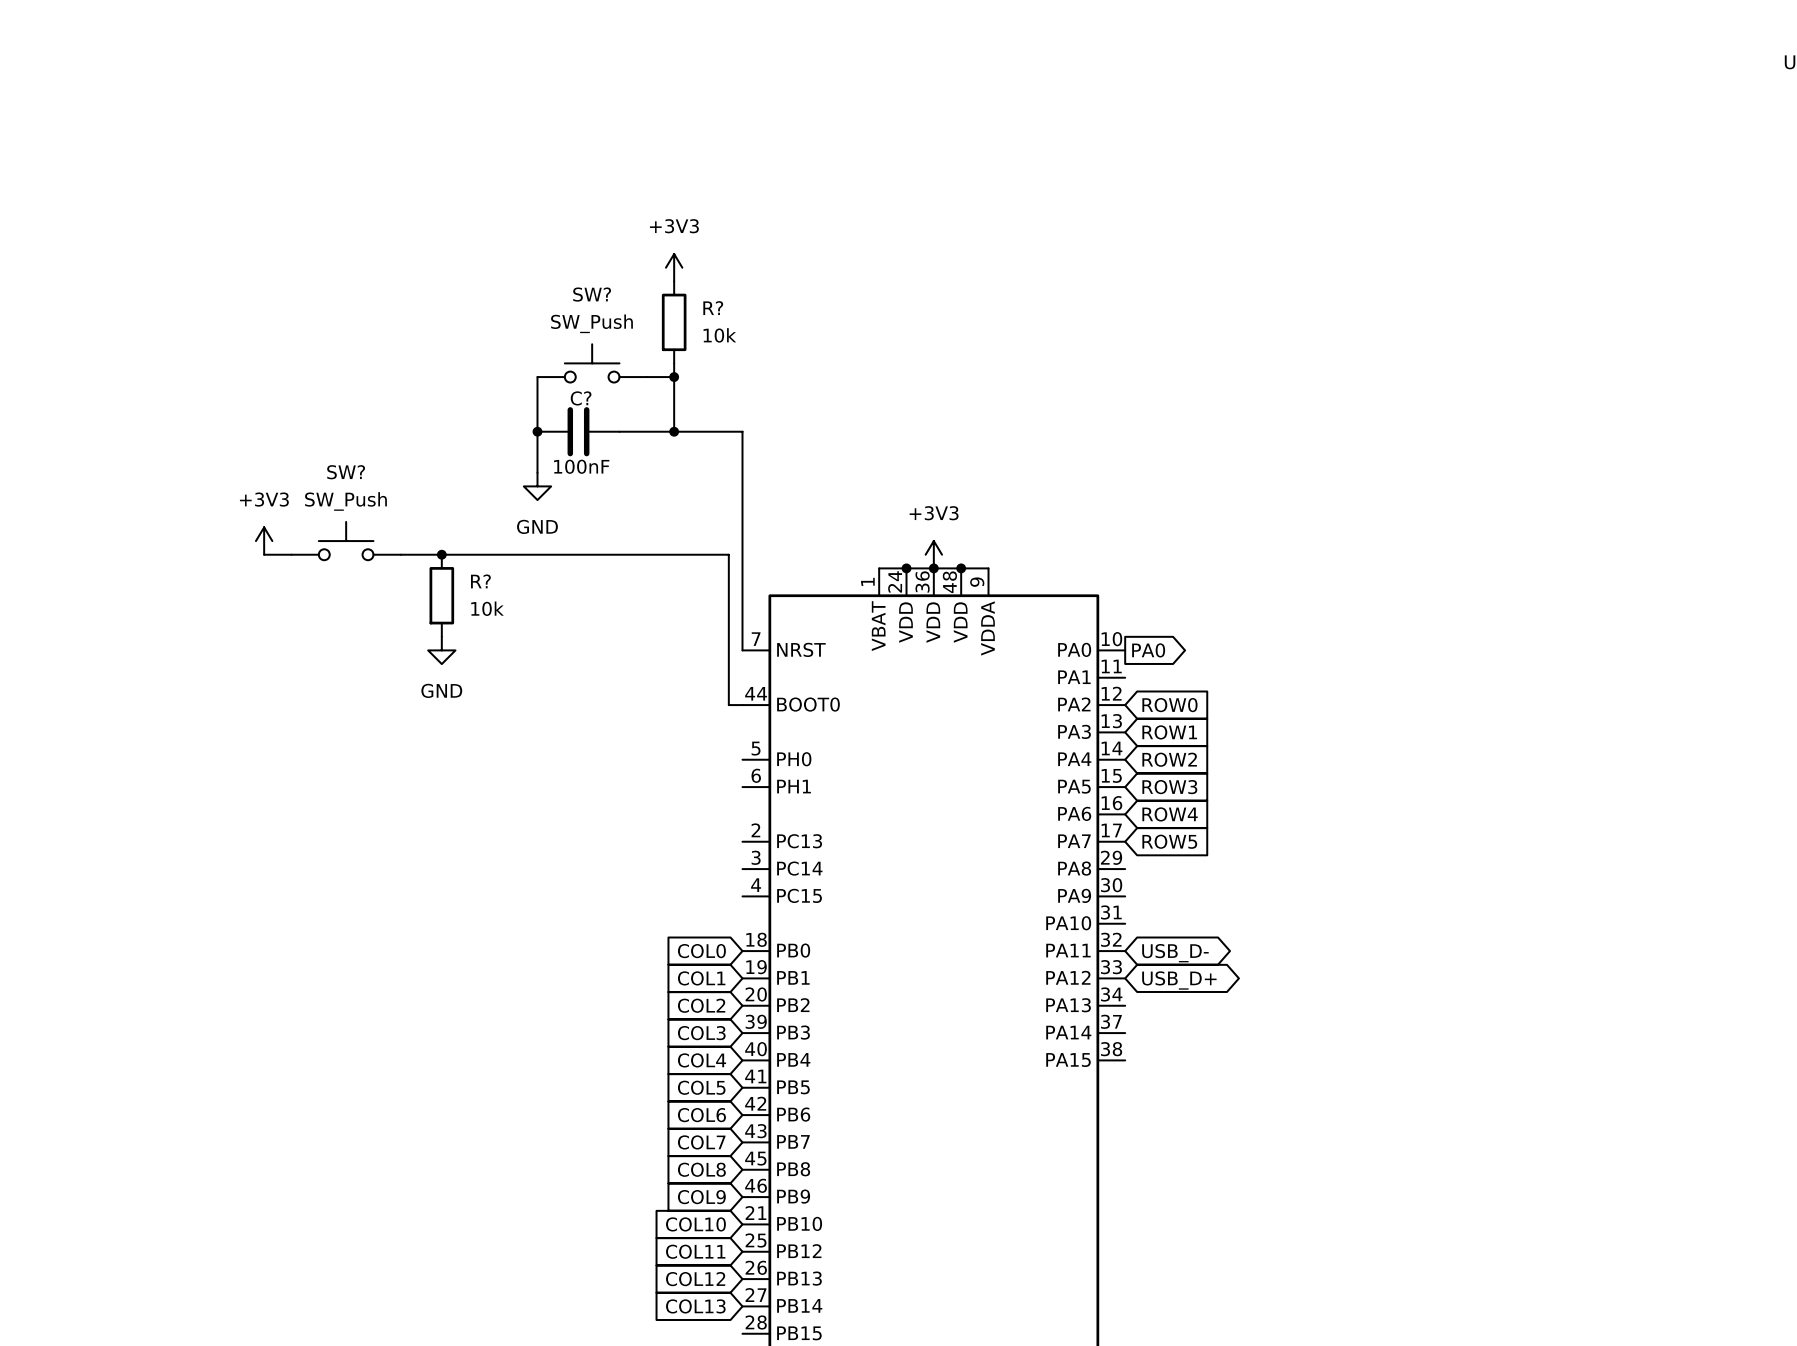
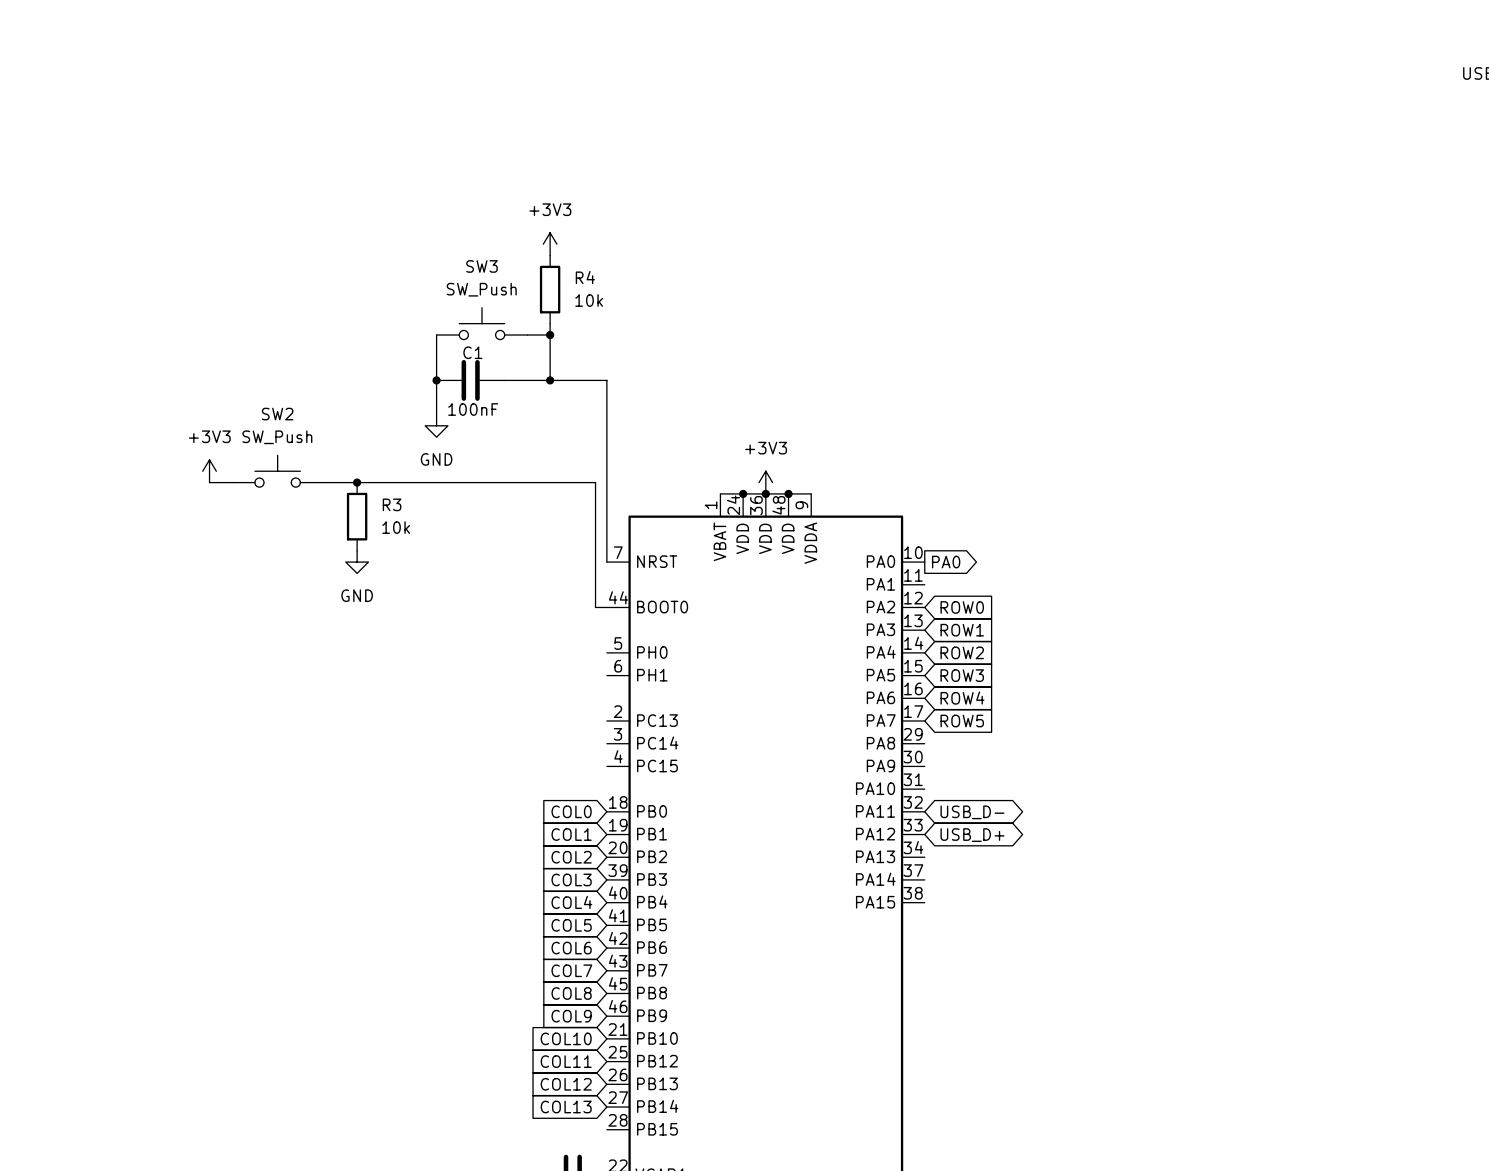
SW? name: SW? (592, 294) -> SW3 (482, 266)
R? name: R? (713, 308) -> R4 (585, 277)
C? name: C? (581, 398) -> C1 (472, 352)
SW? name: SW? (346, 472) -> SW2 (277, 414)
R? name: R? (480, 581) -> R3 (392, 504)

